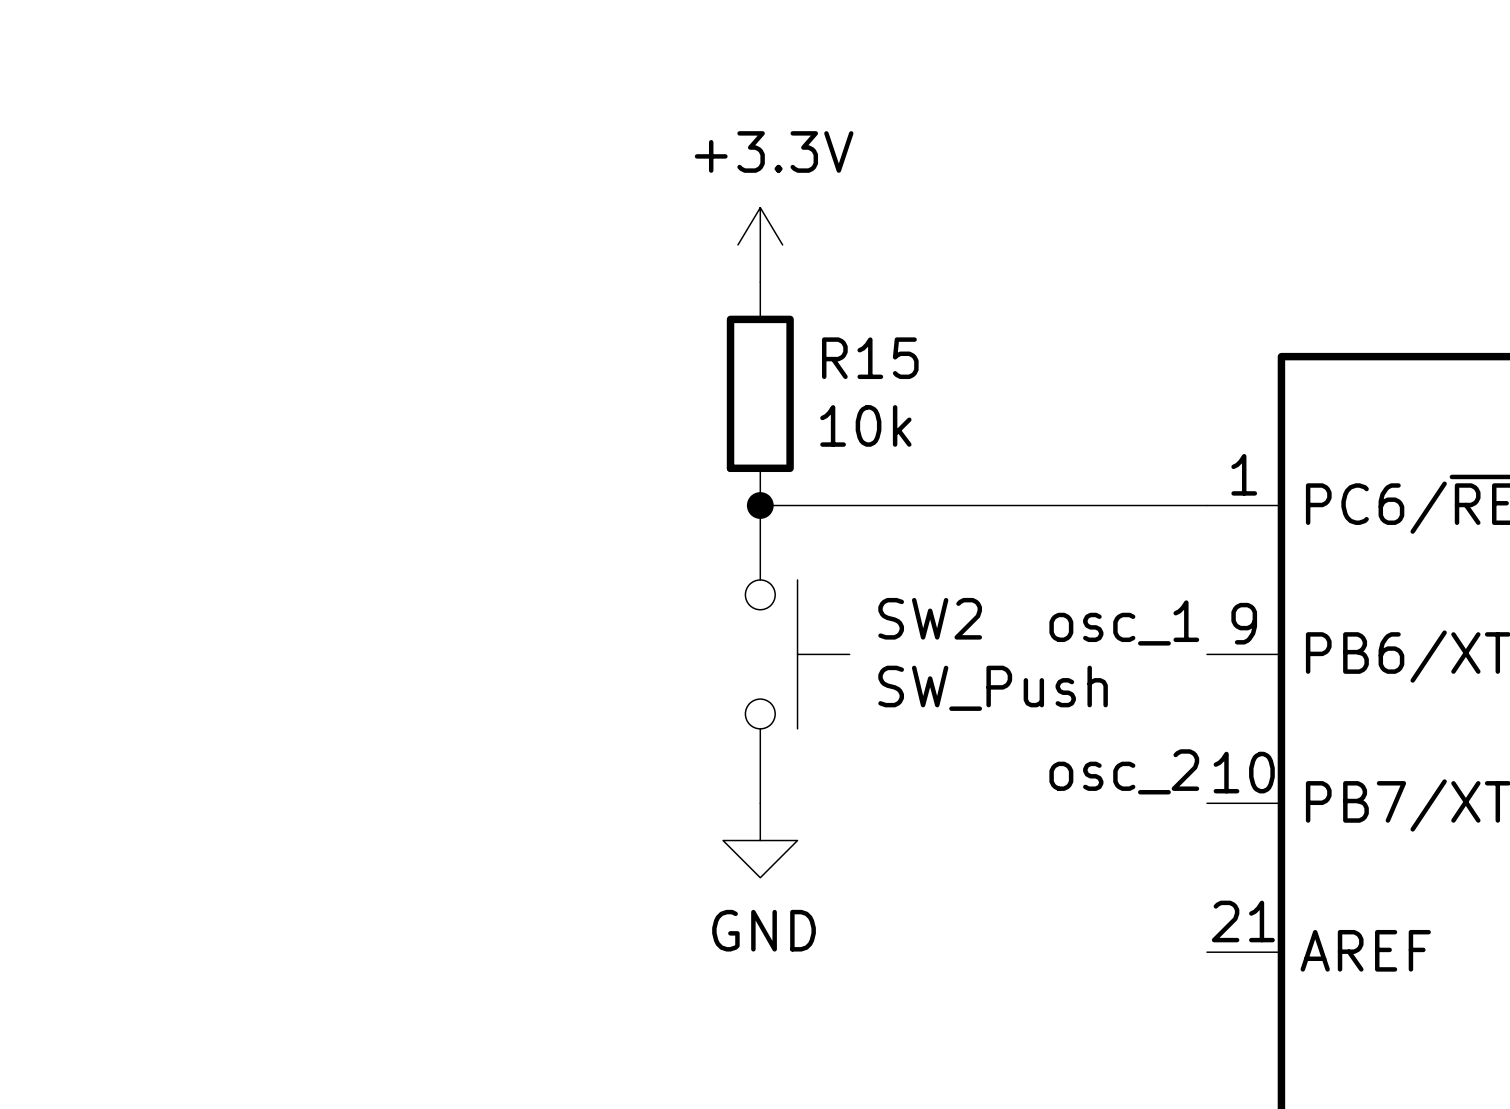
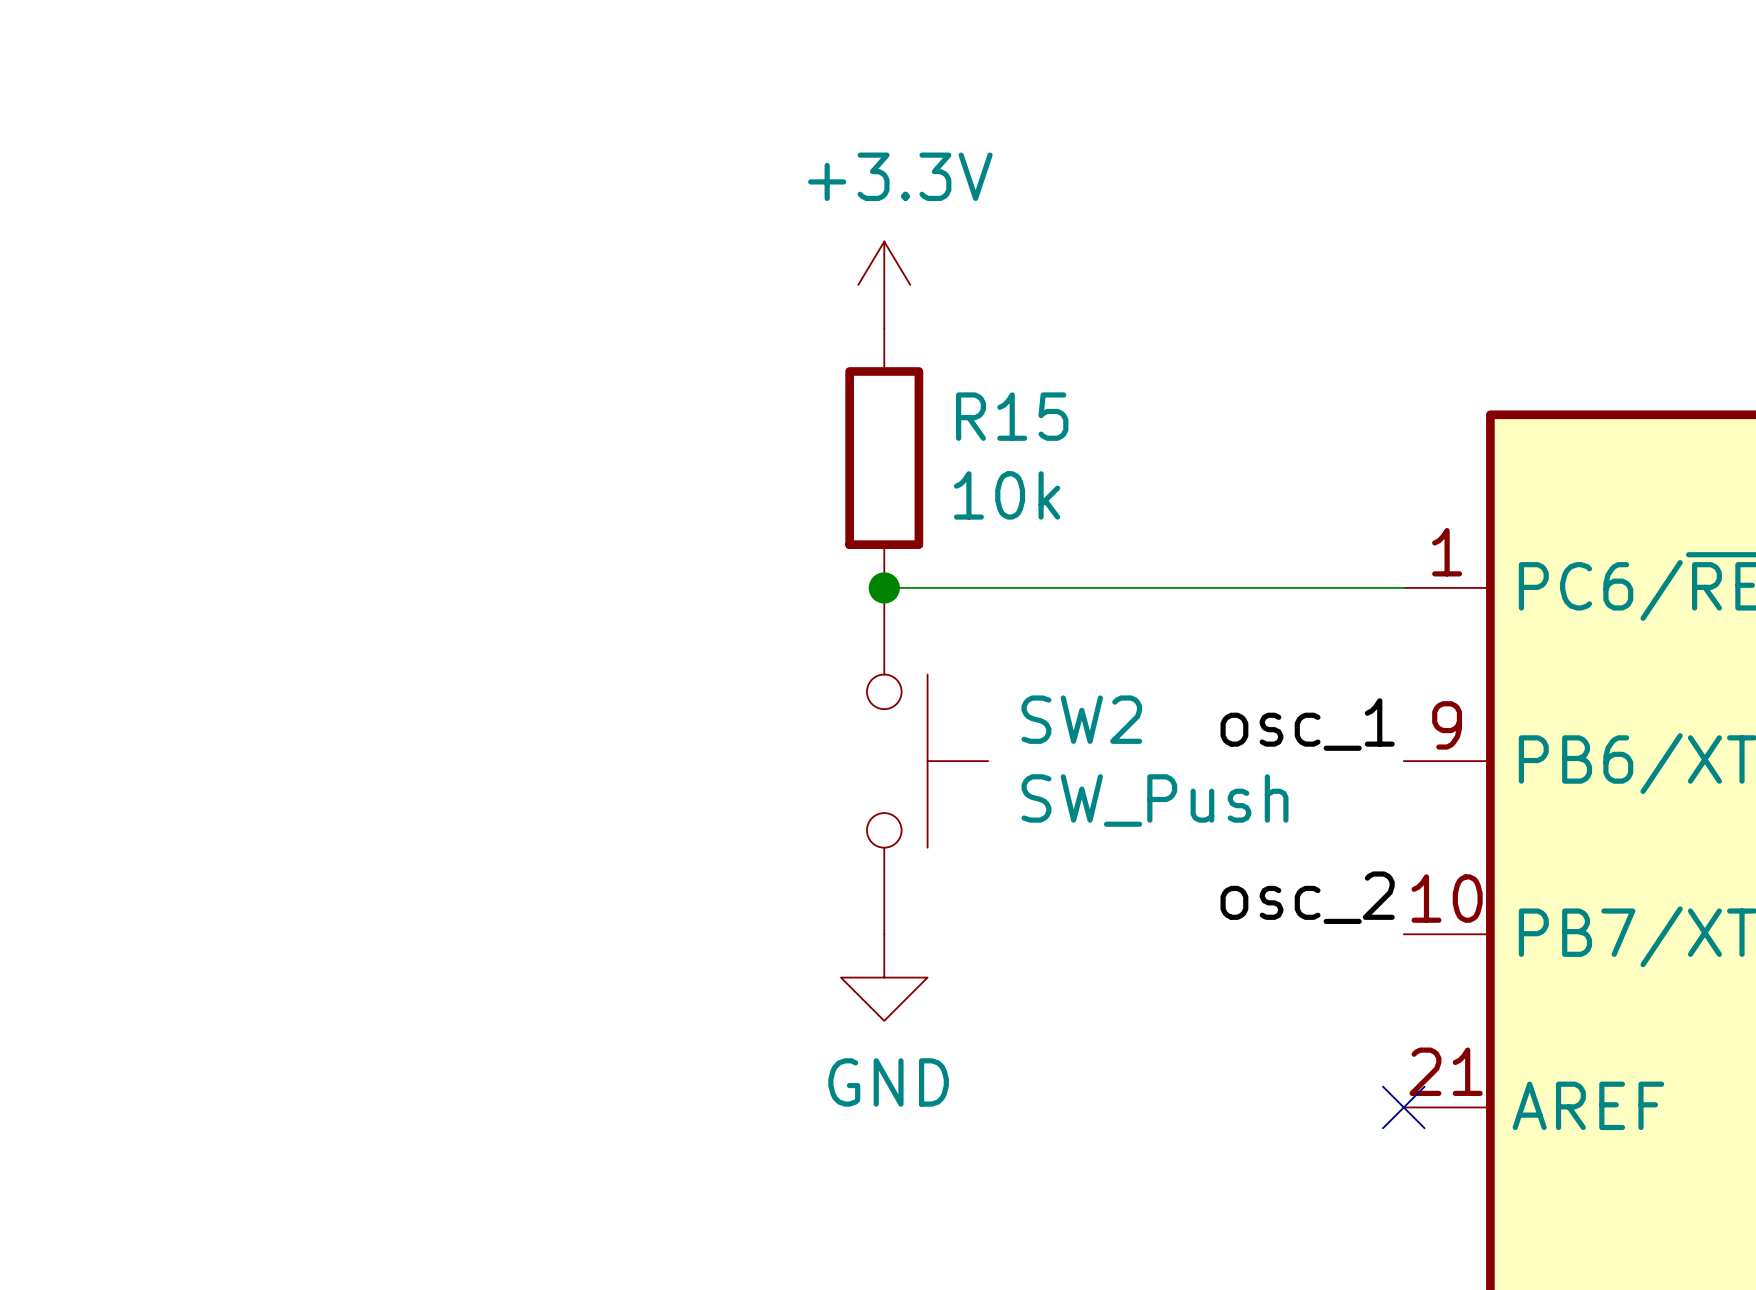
no-connect mark: none -> (1403, 1107)

